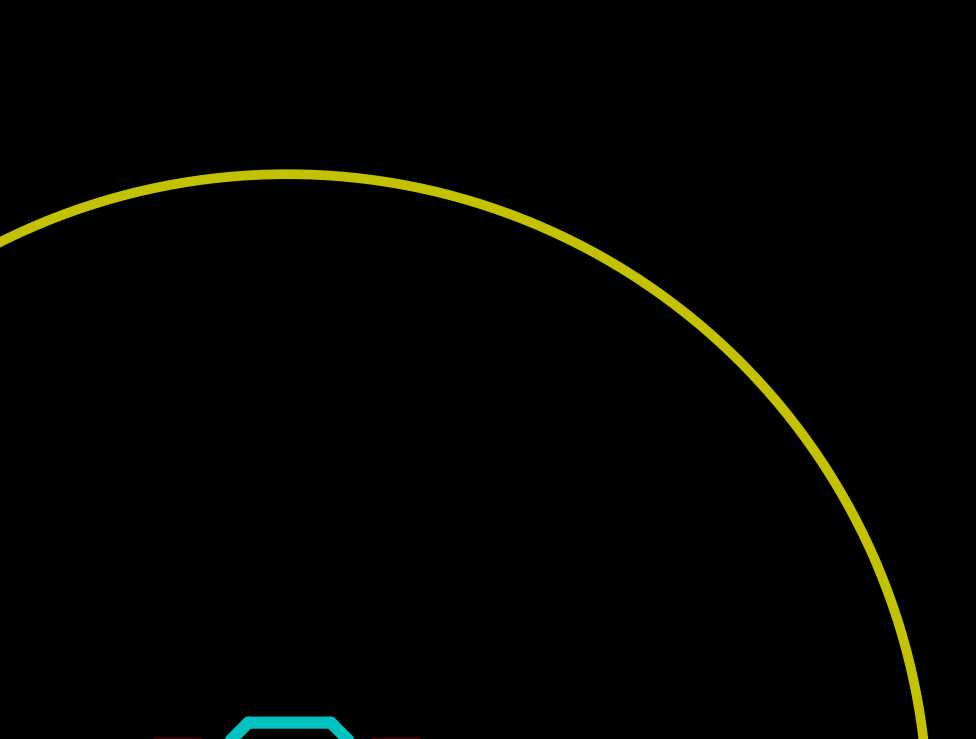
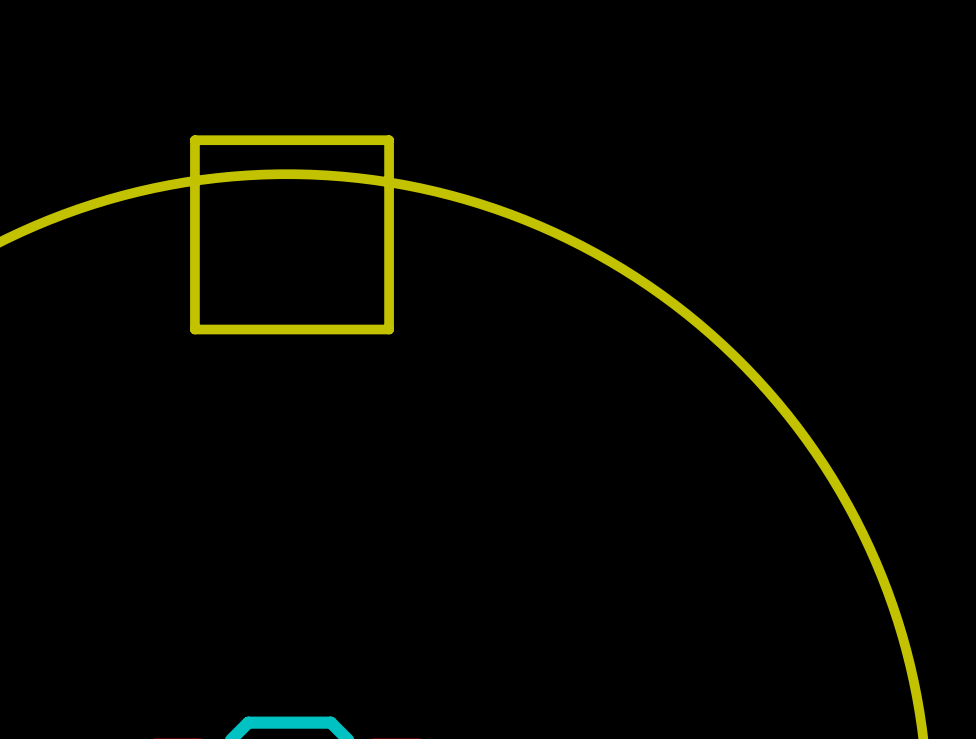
board edge: none -> (194, 140) (389, 140) (389, 329) (194, 329) (194, 140)

